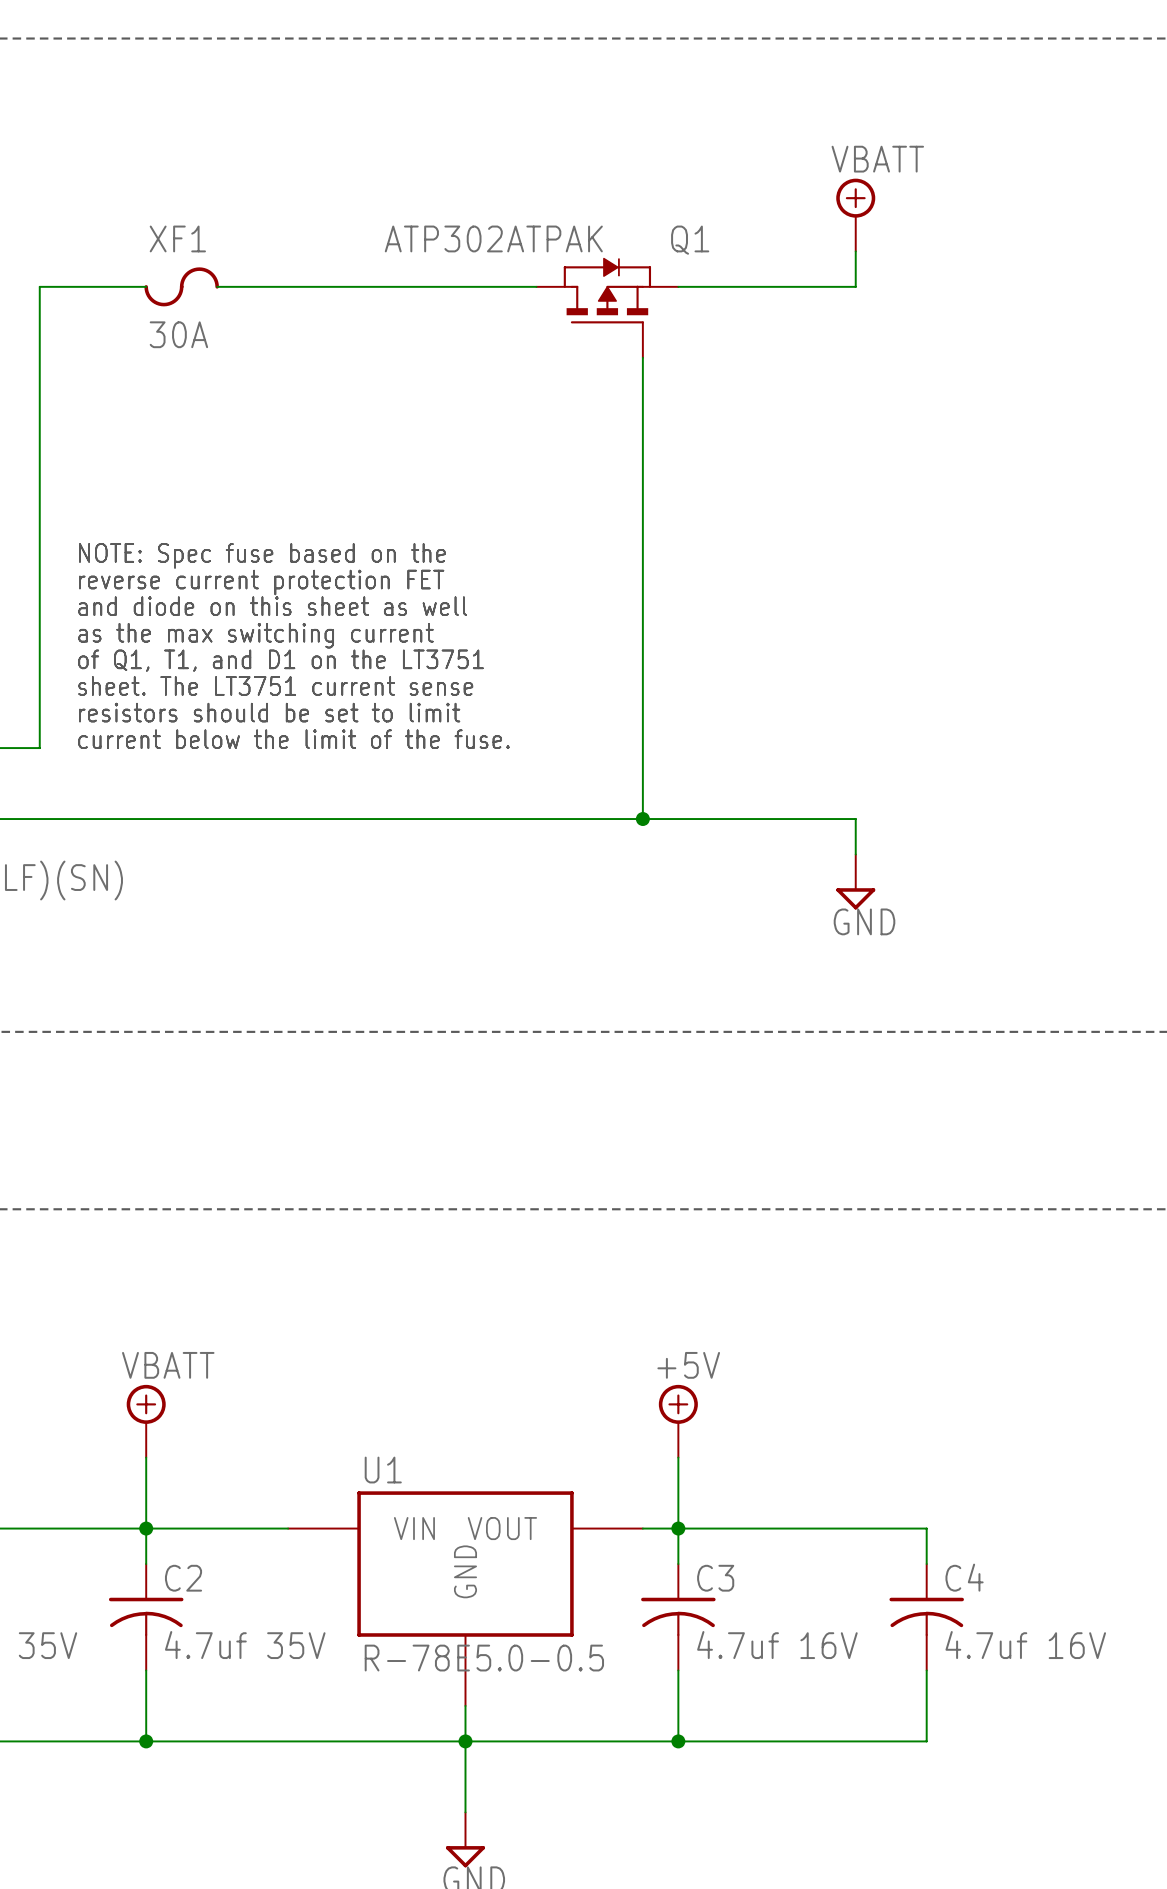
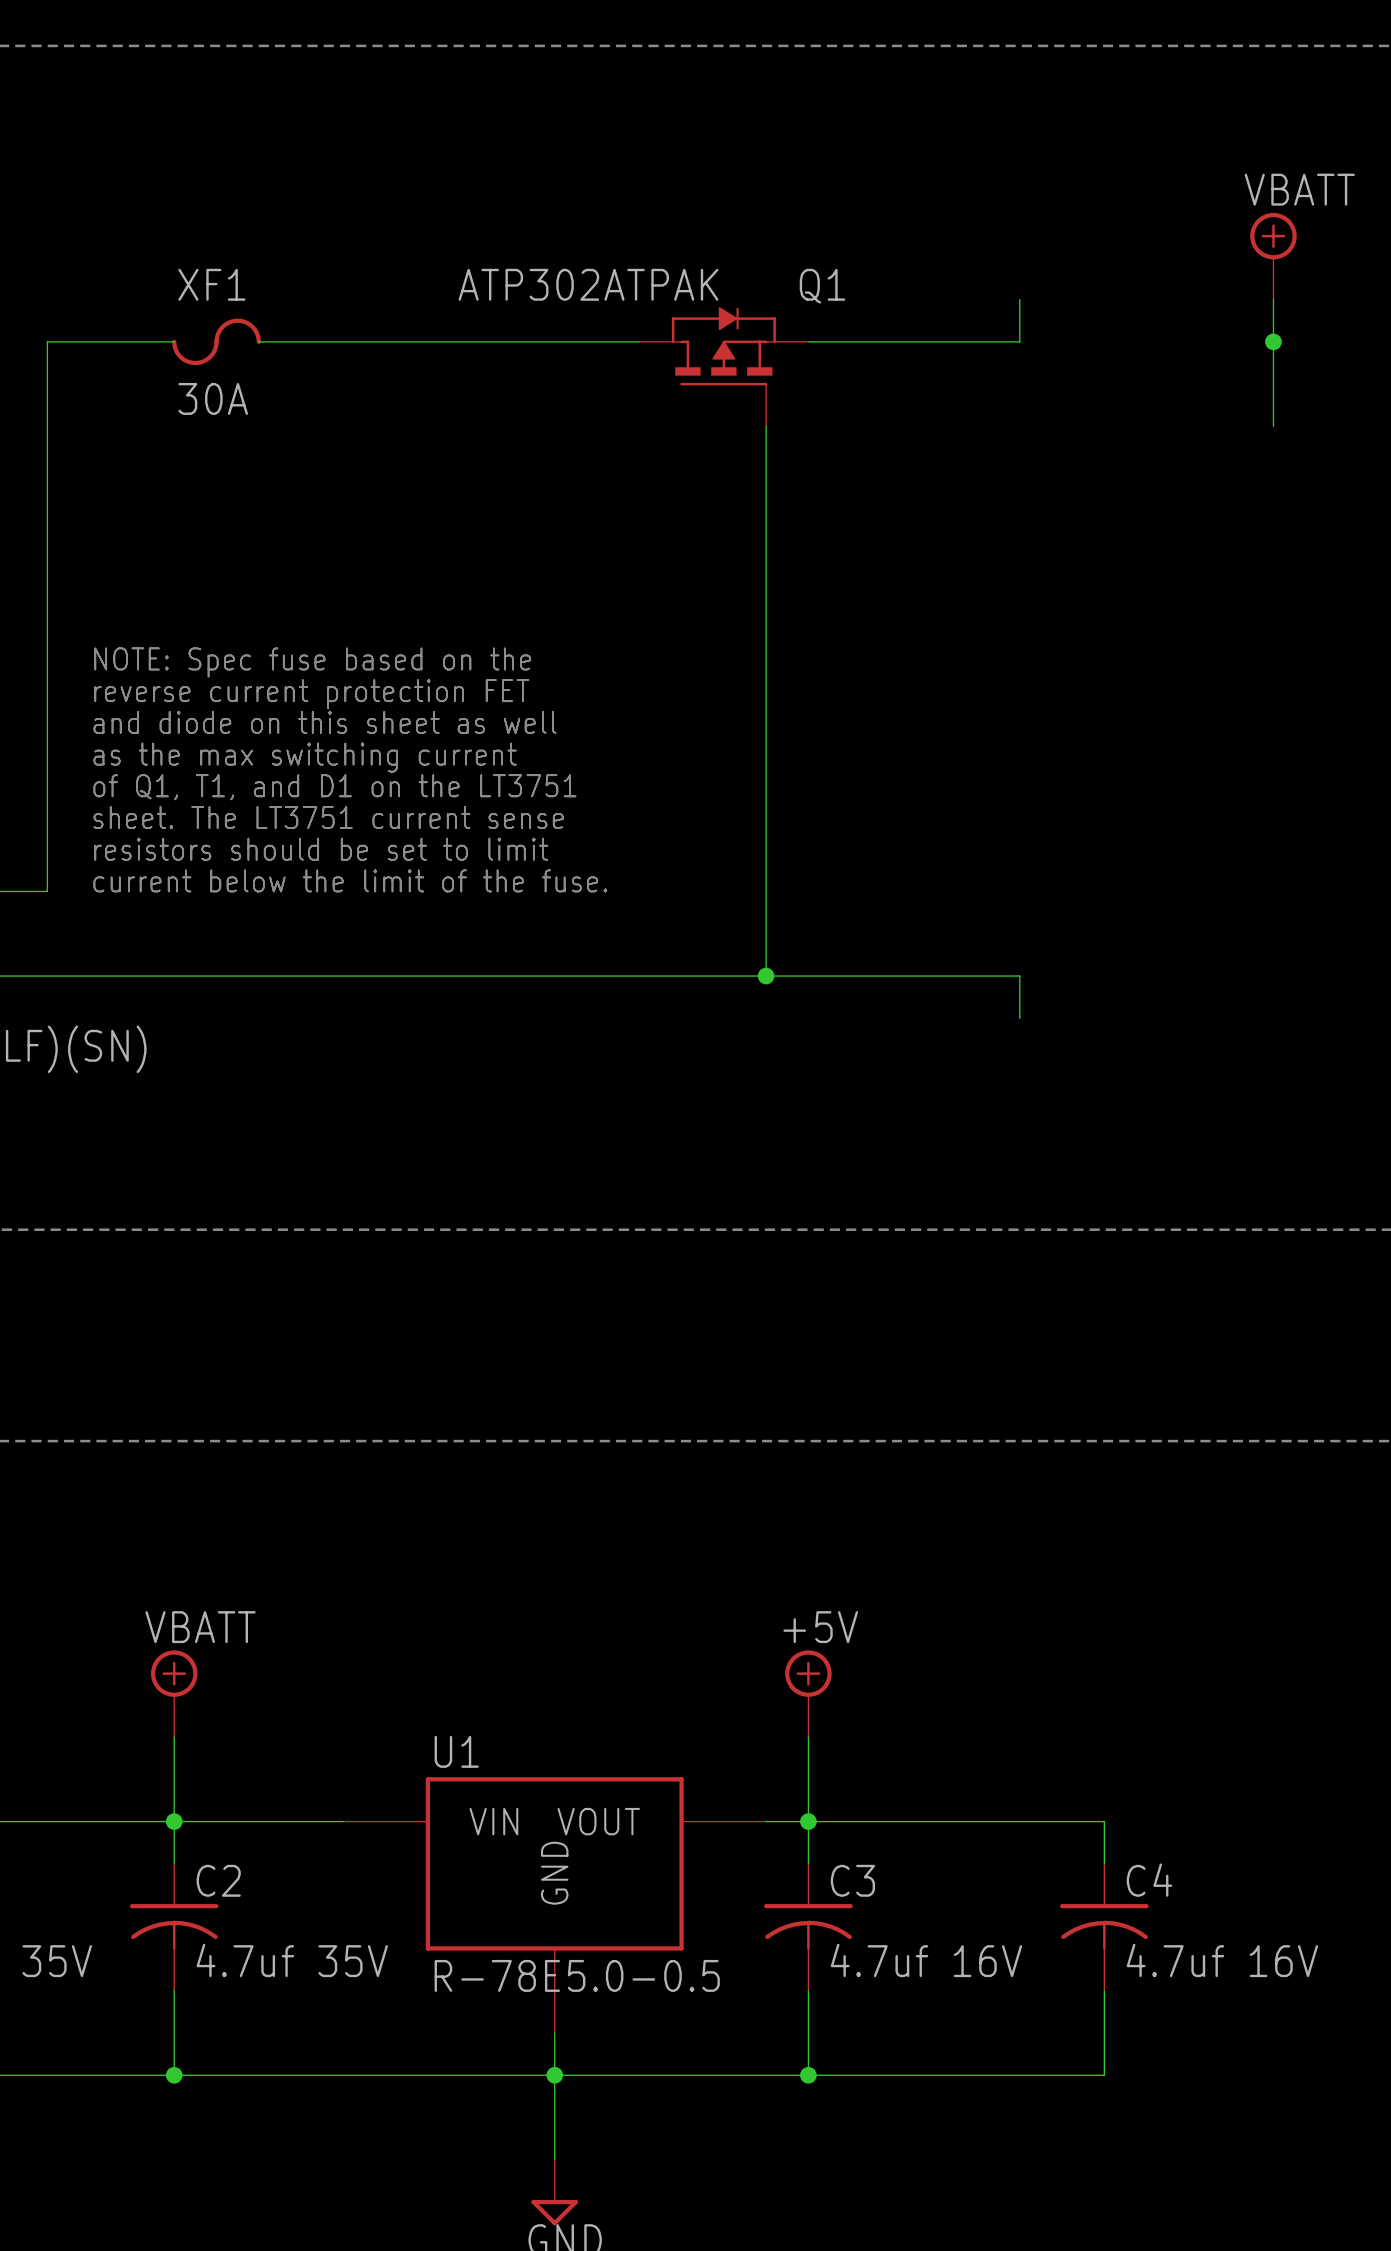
power symbol position: VBATT (855, 215) -> VBATT (1273, 256)
wire: none -> (1273, 299) (1273, 426)
junction: none -> (1273, 341)
power symbol: GND (855, 881) -> none

